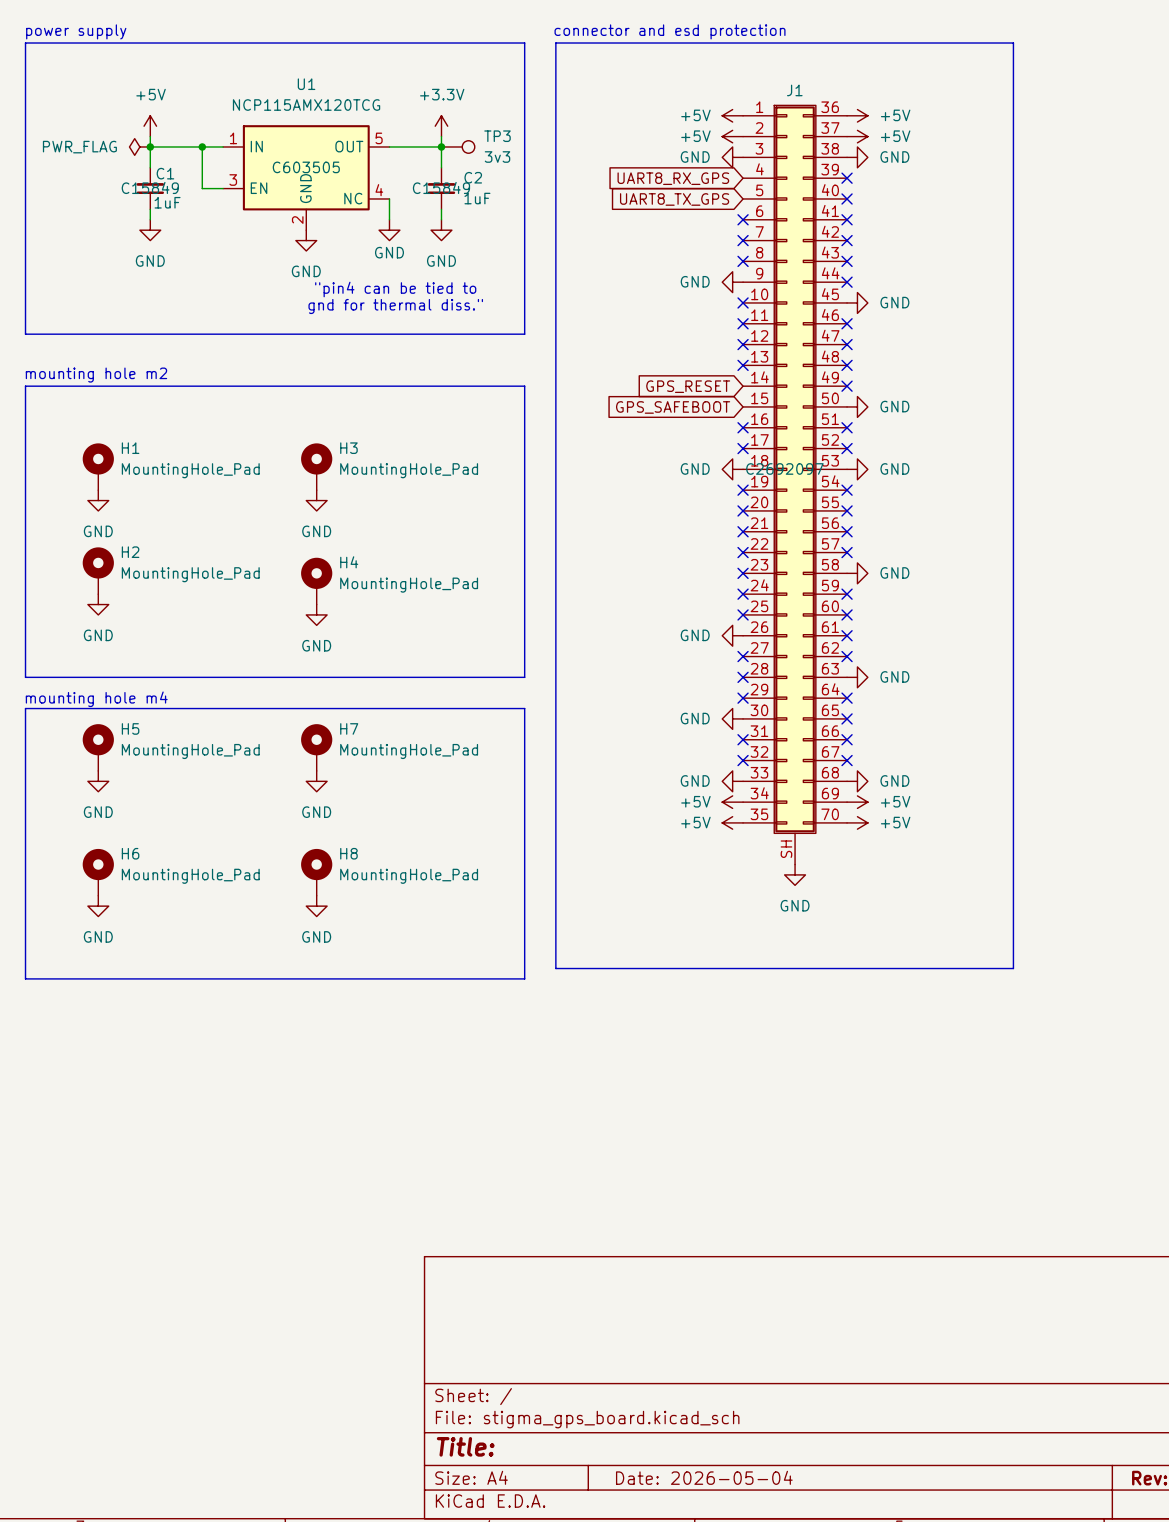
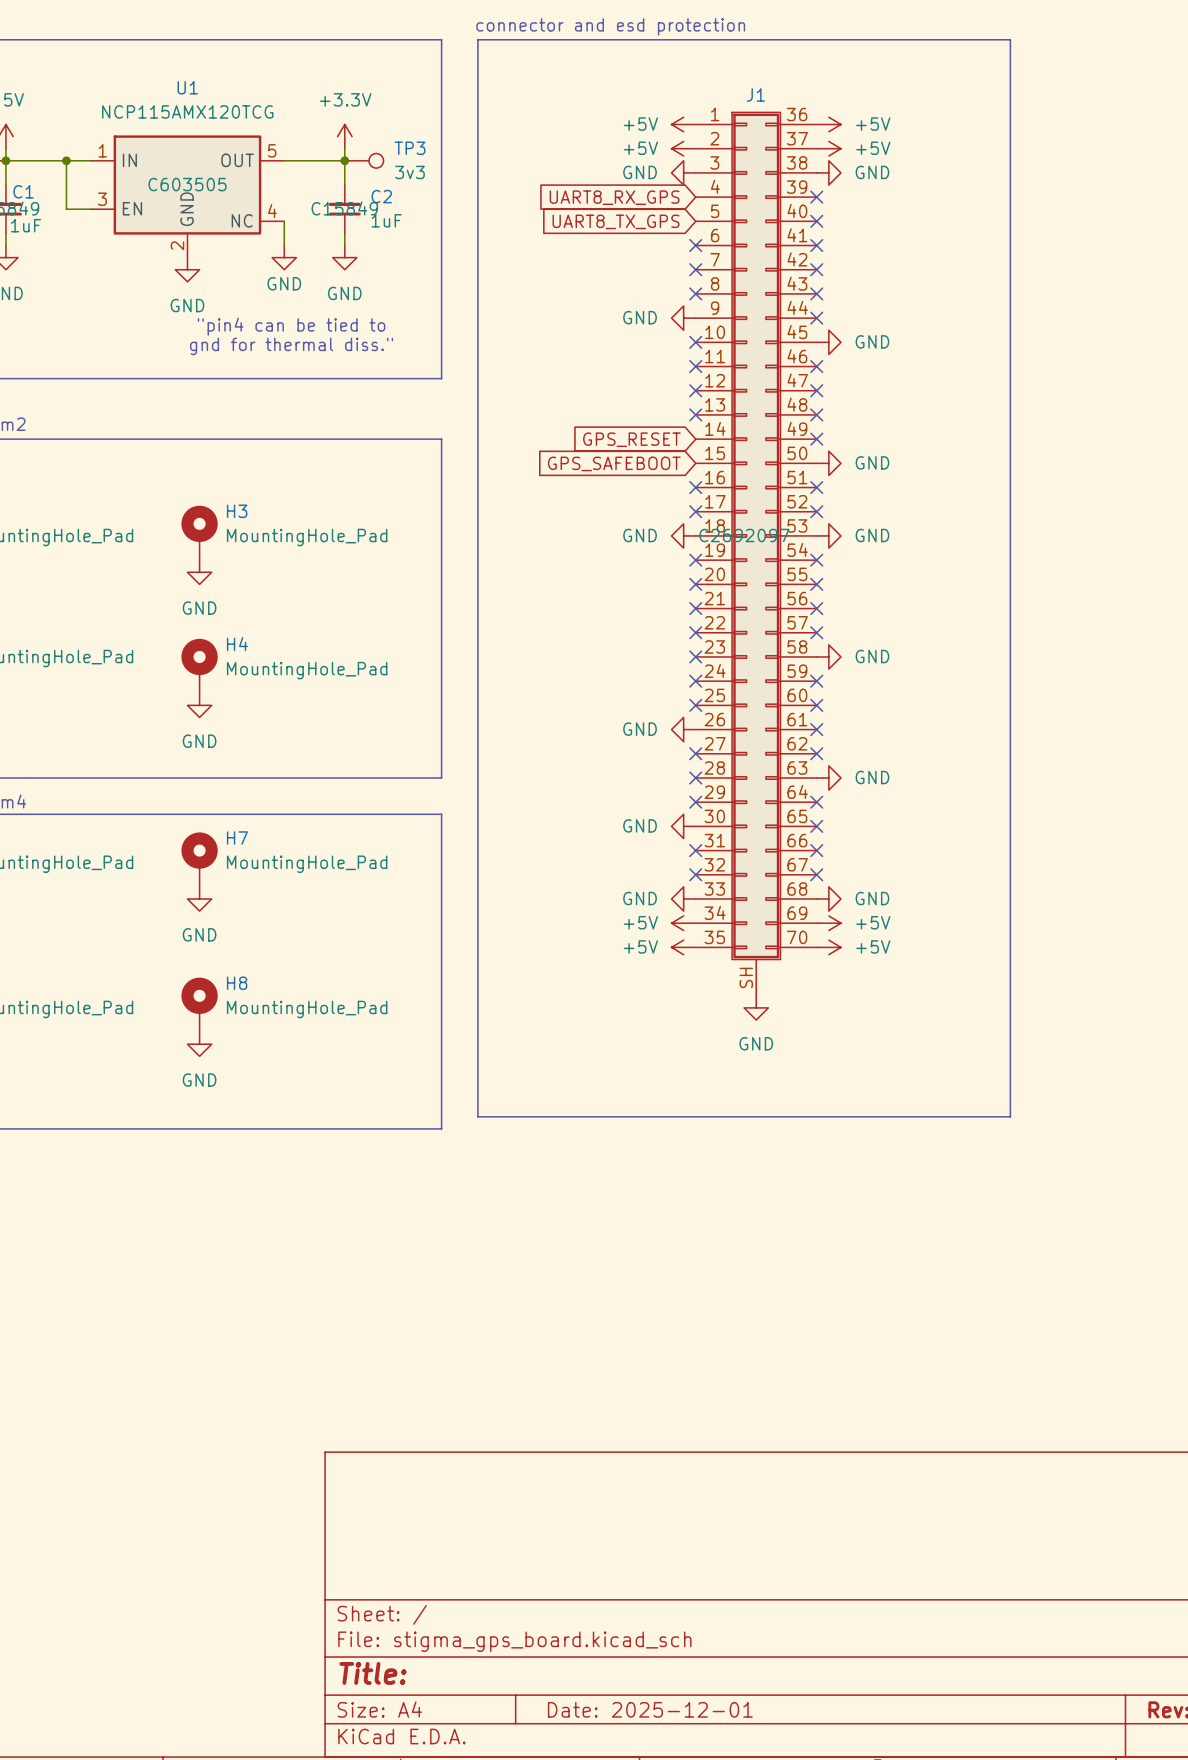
title block: Date: 2026-05-04 (704, 1477) -> Date: 2025-12-01 (650, 1709)

